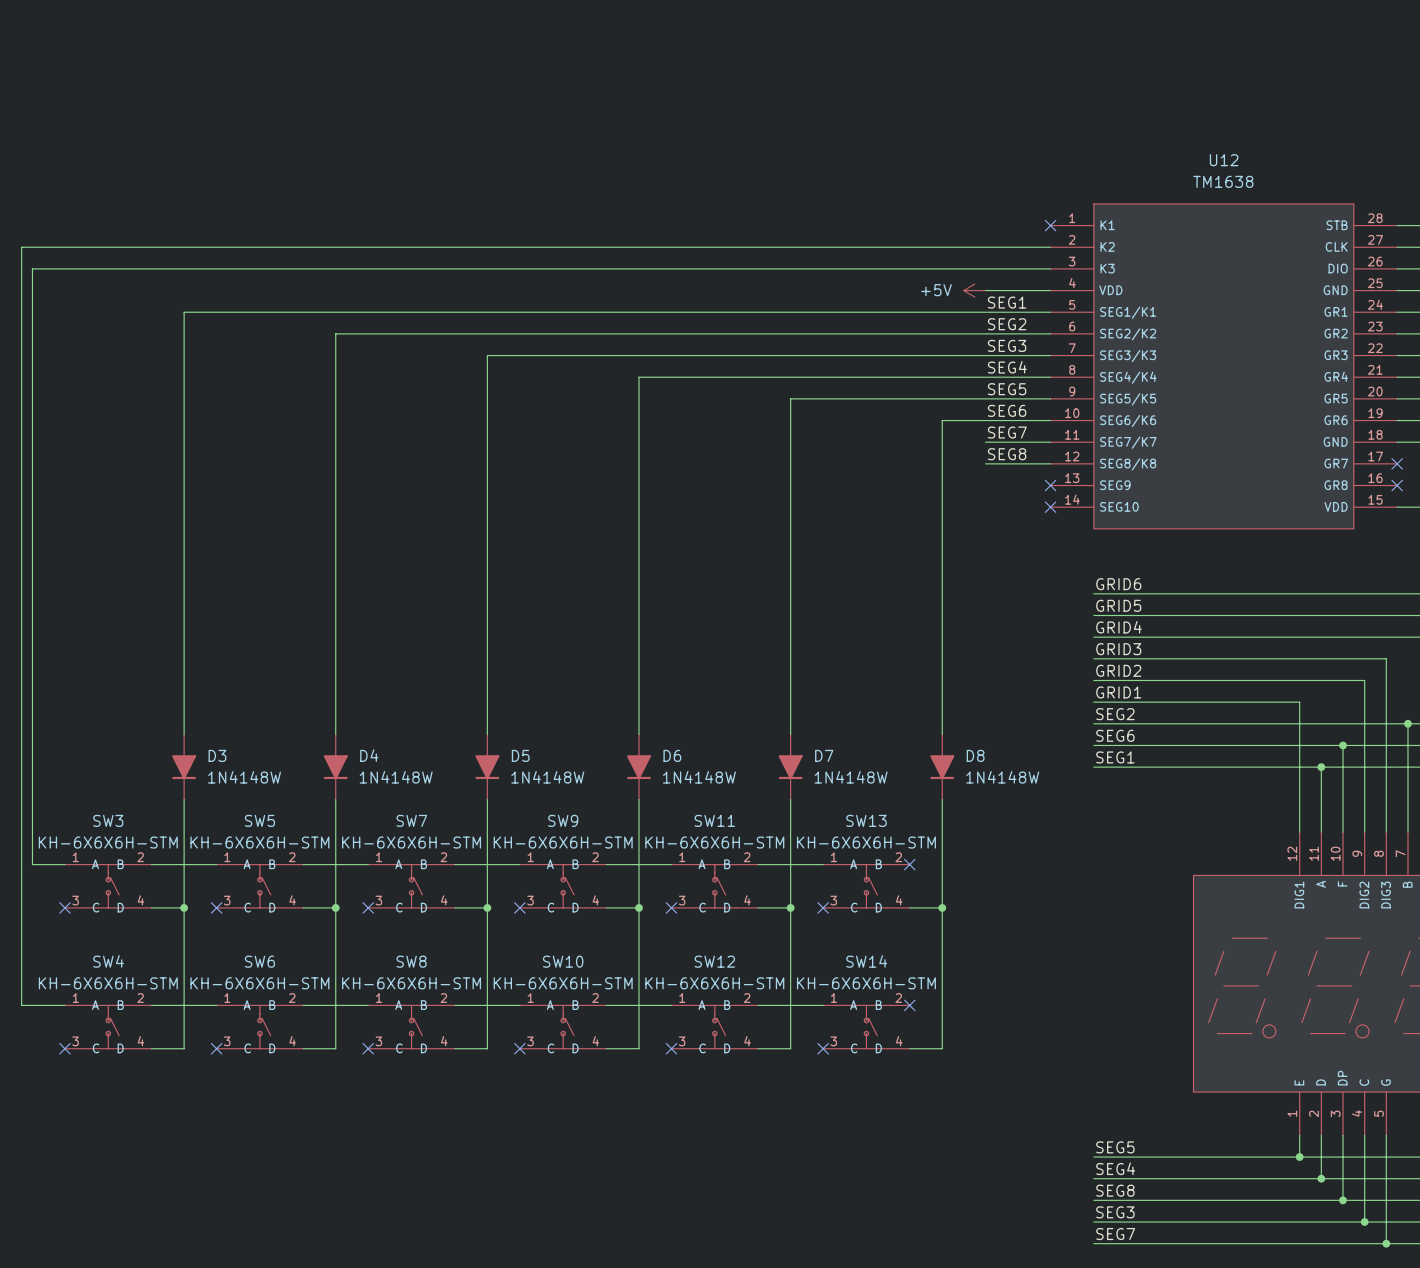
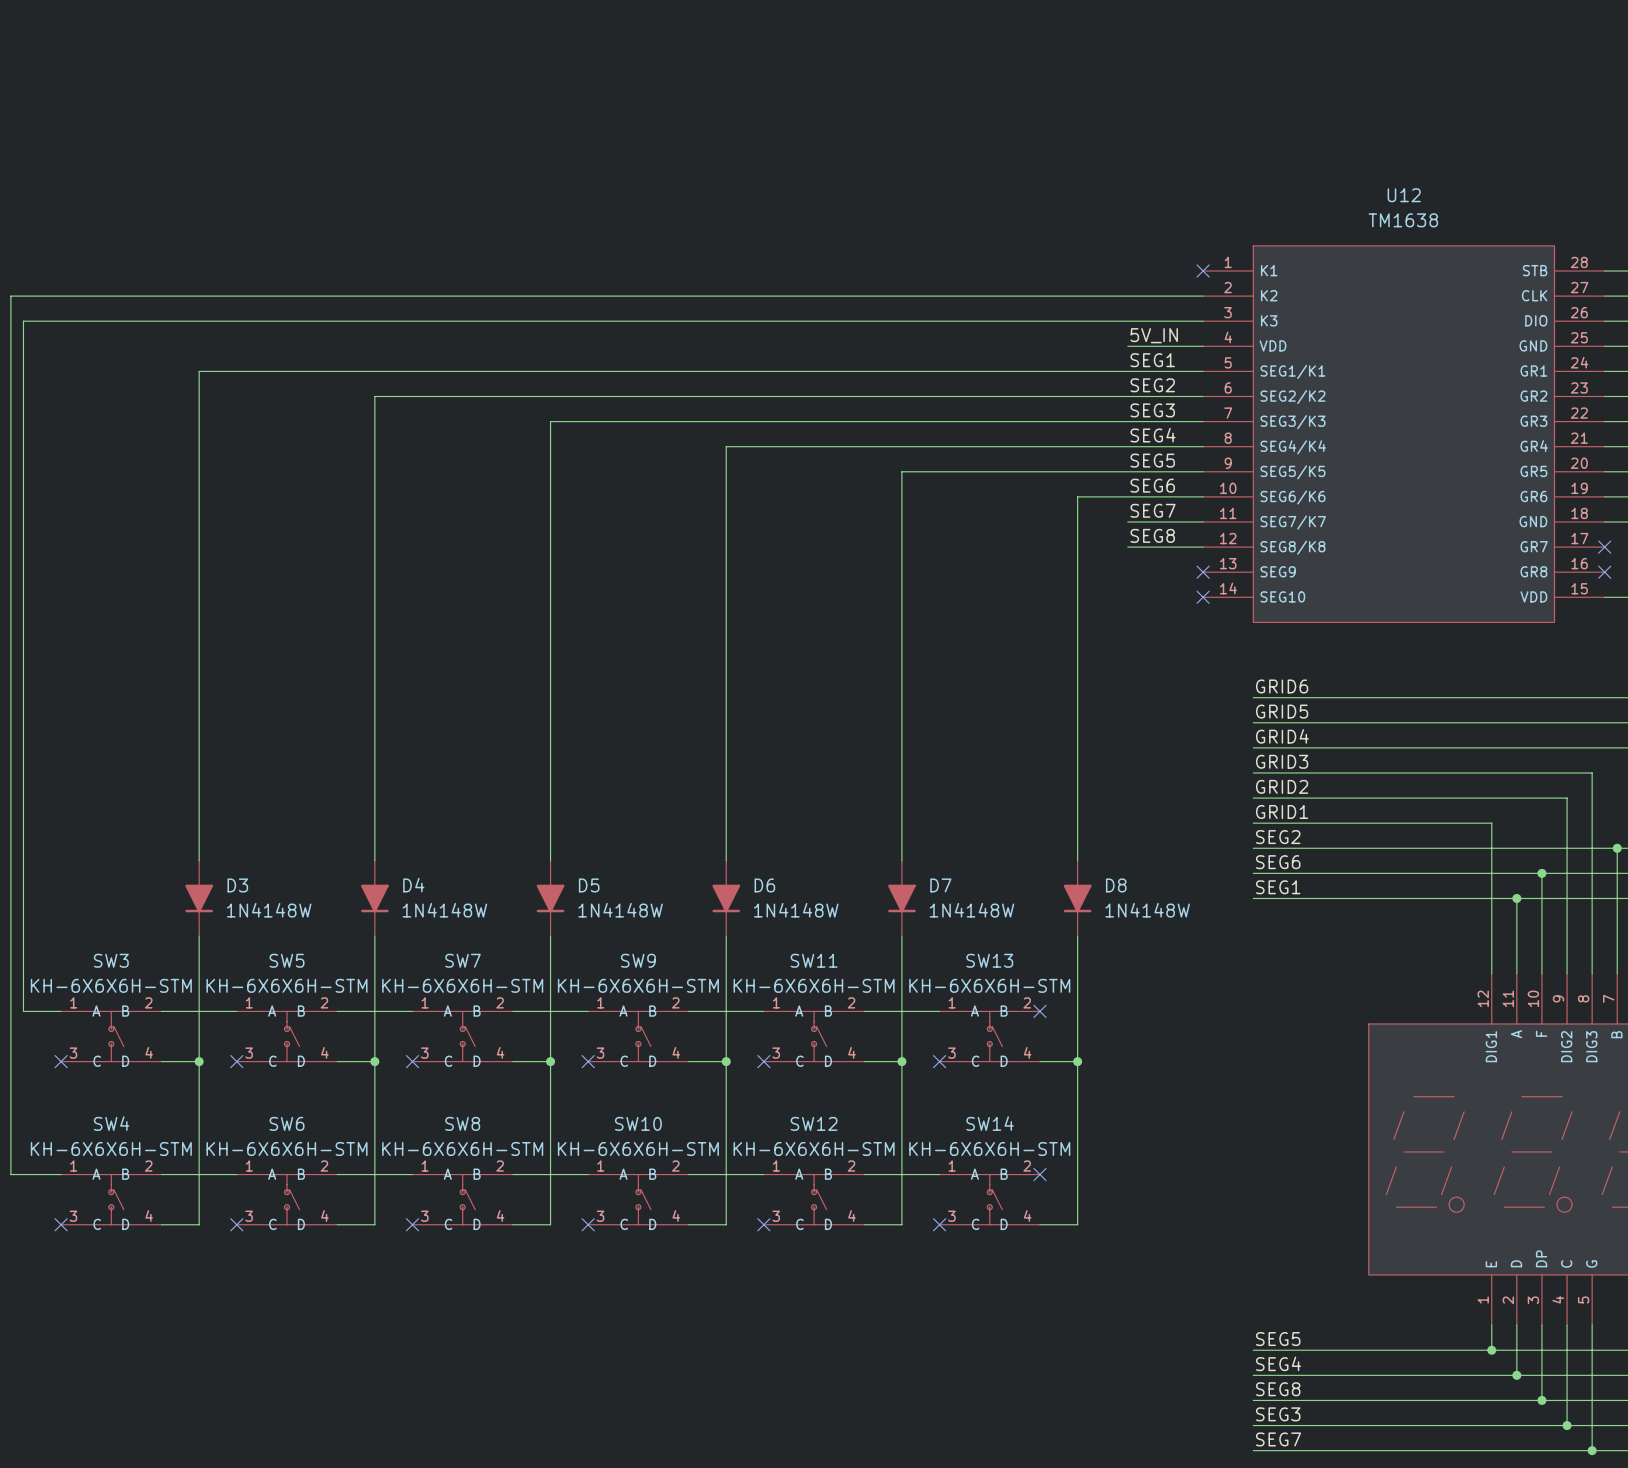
label: none -> 5V_IN (1154, 335)
power symbol: +5V (974, 290) -> none

